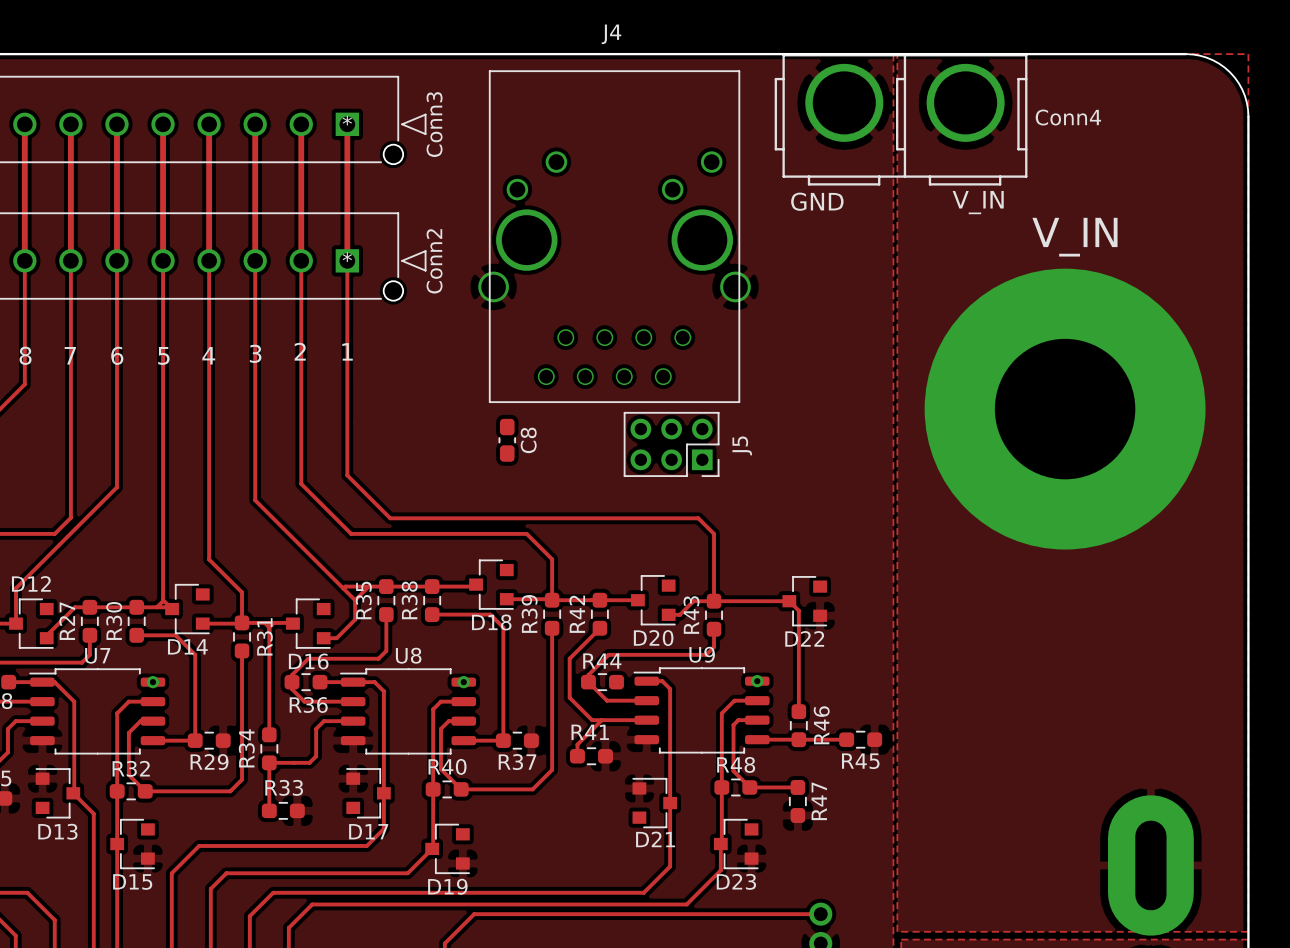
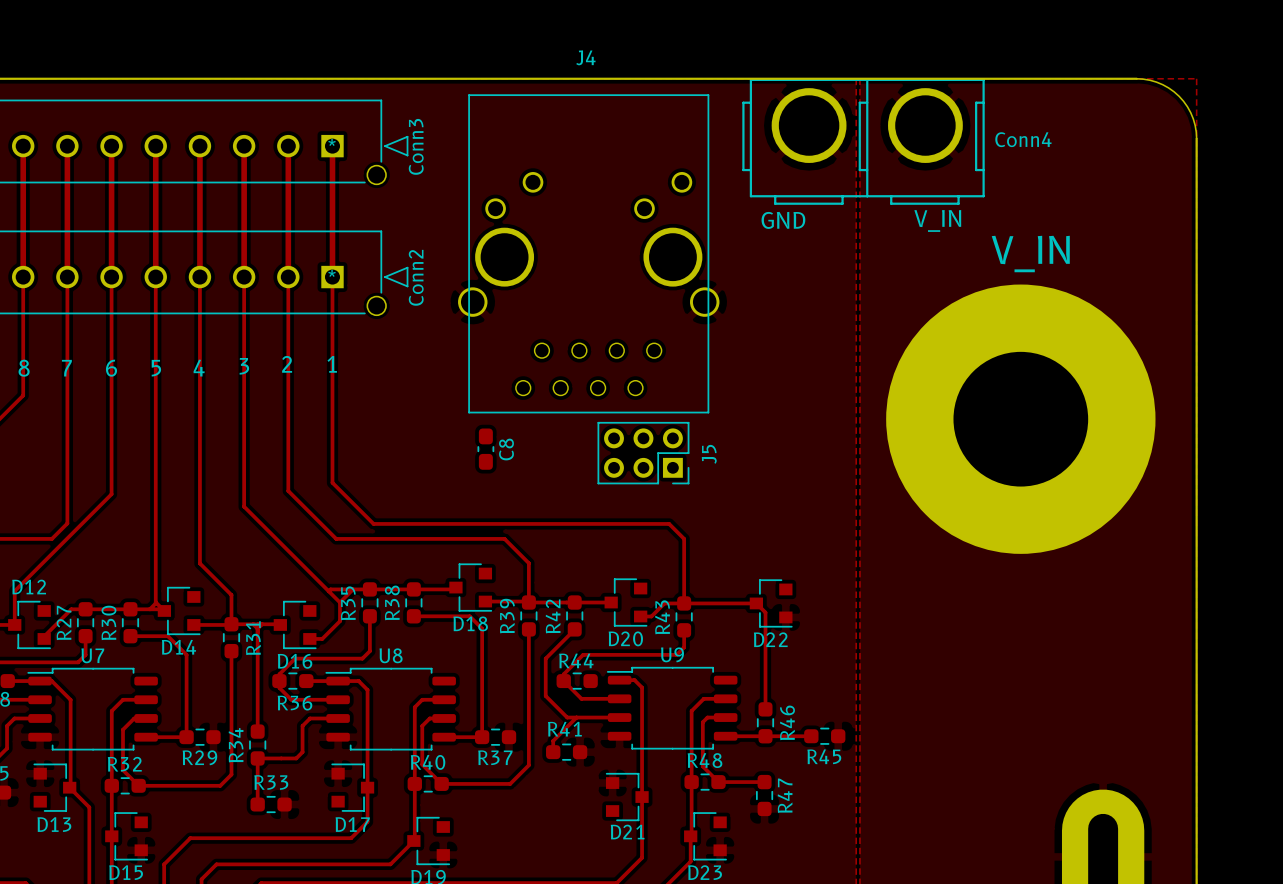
via: (757, 681) -> none
via: (152, 682) -> none
via: (463, 682) -> none

